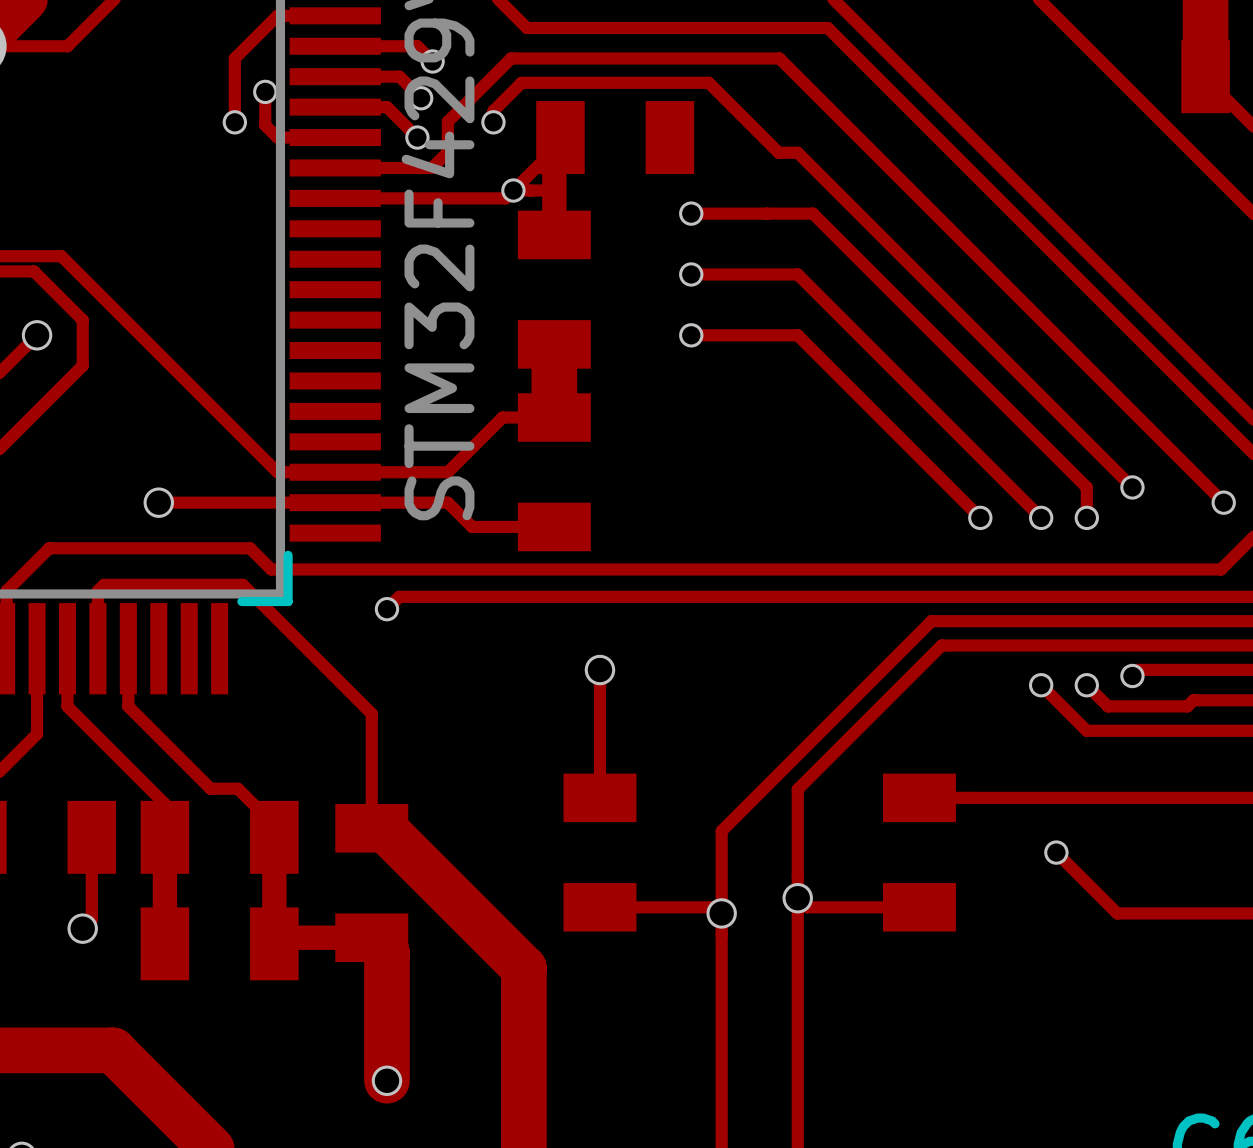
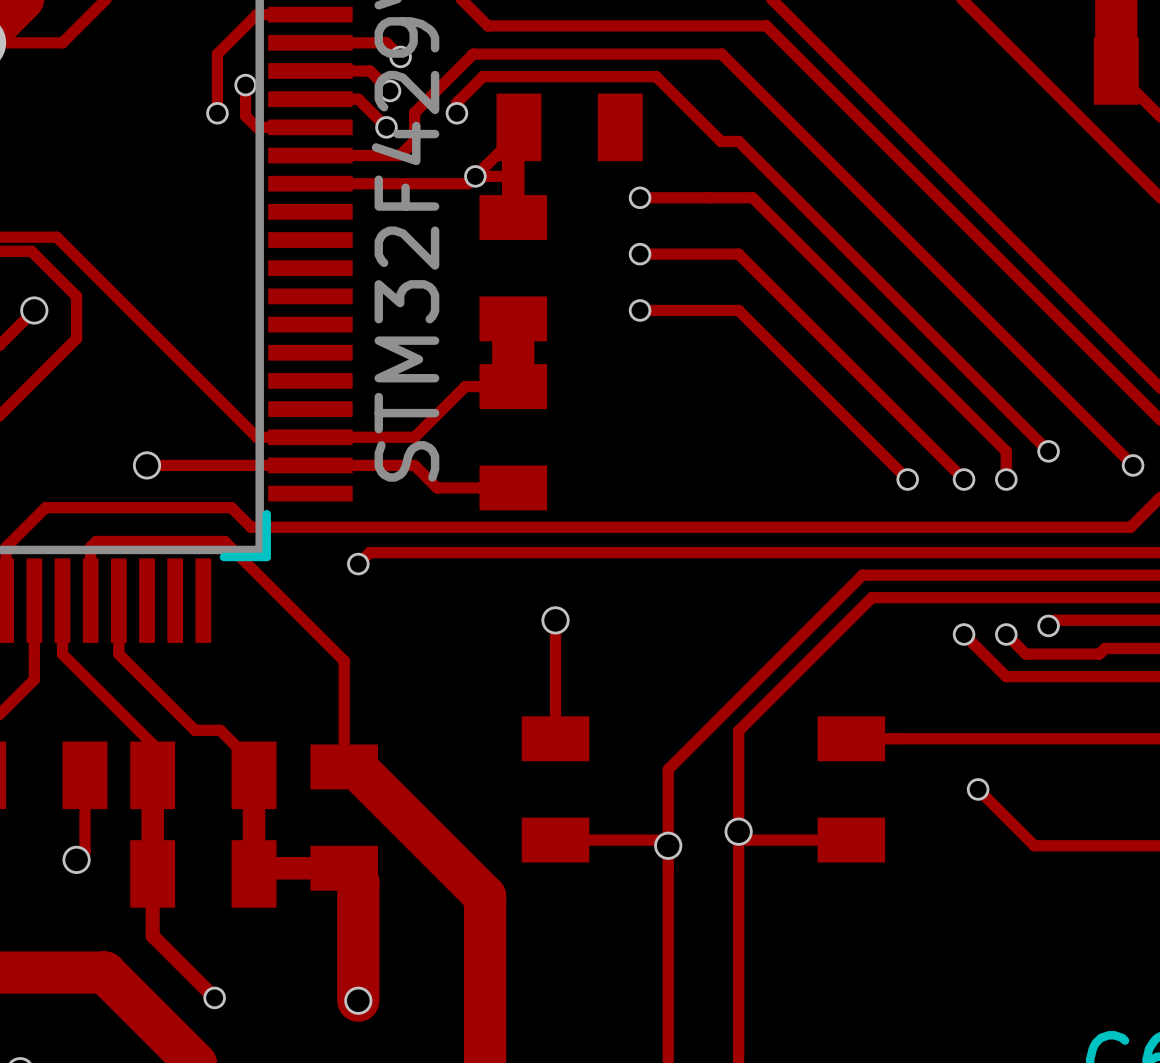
track: none -> (152, 873) (152, 935) (214, 997)
via: none -> (214, 997)

